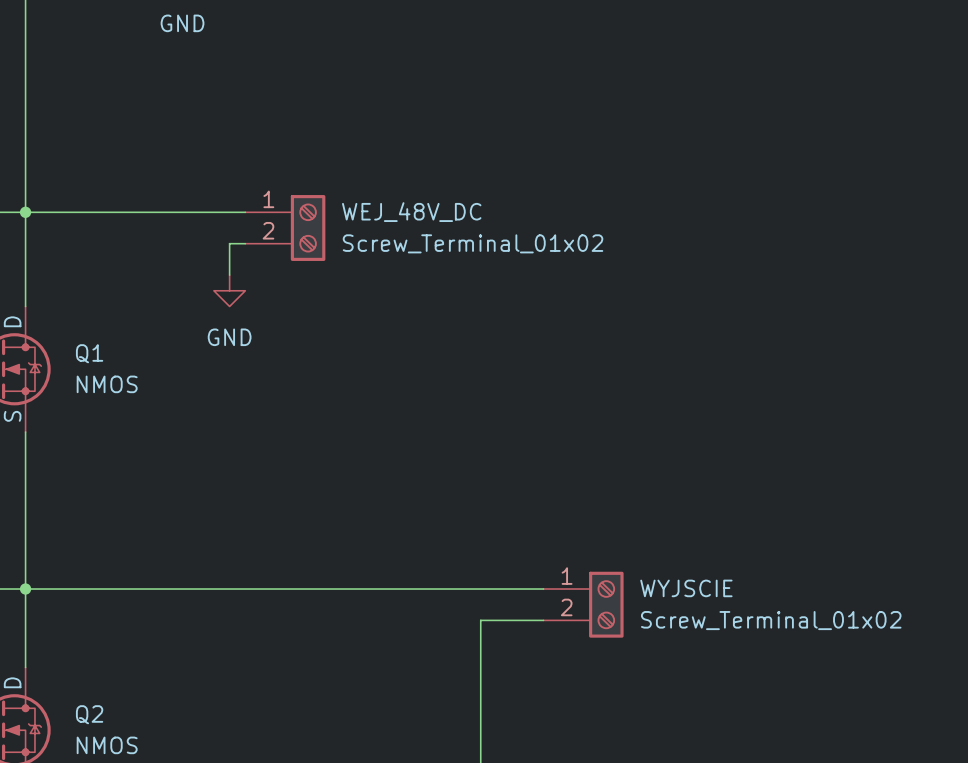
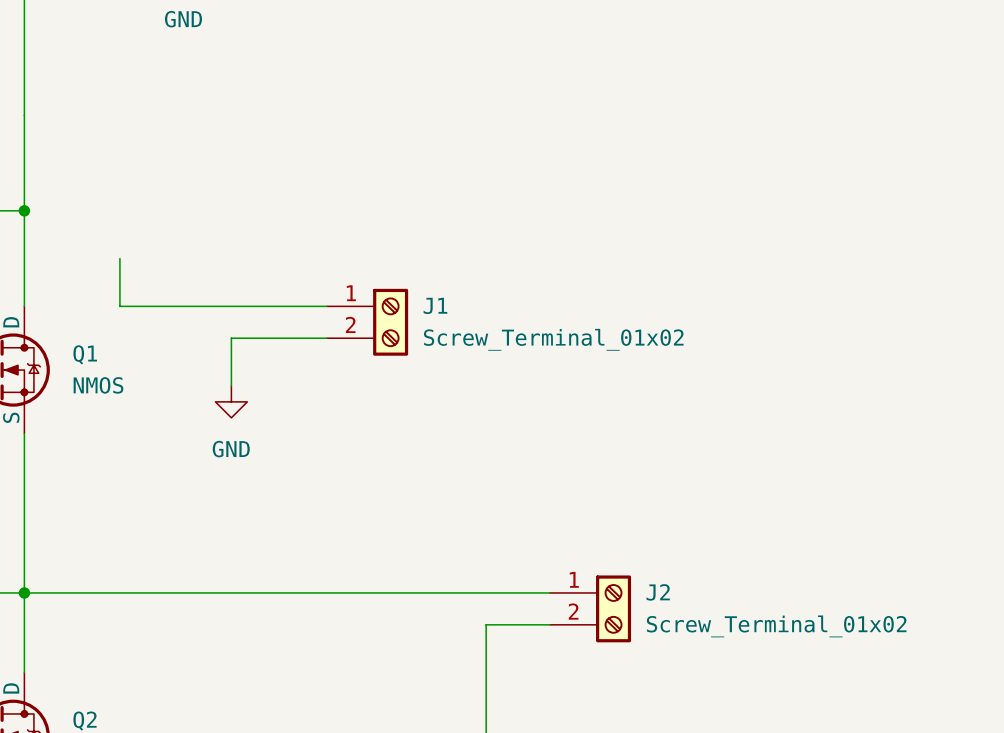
wire: (25, 212) (245, 212) -> none
WEJ_48V_DC: Screw_Terminal_01x02 (285, 228) -> none
wire: (245, 243) (229, 243) (229, 275) -> none
wire: none -> (119, 258) (119, 306) (326, 306)
power symbol position: GND (229, 290) -> GND (231, 401)
J1: none -> Screw_Terminal_01x02 (367, 322)
wire: none -> (326, 338) (231, 338) (231, 385)
WYJSCIE name: WYJSCIE (686, 588) -> J2 (658, 592)

